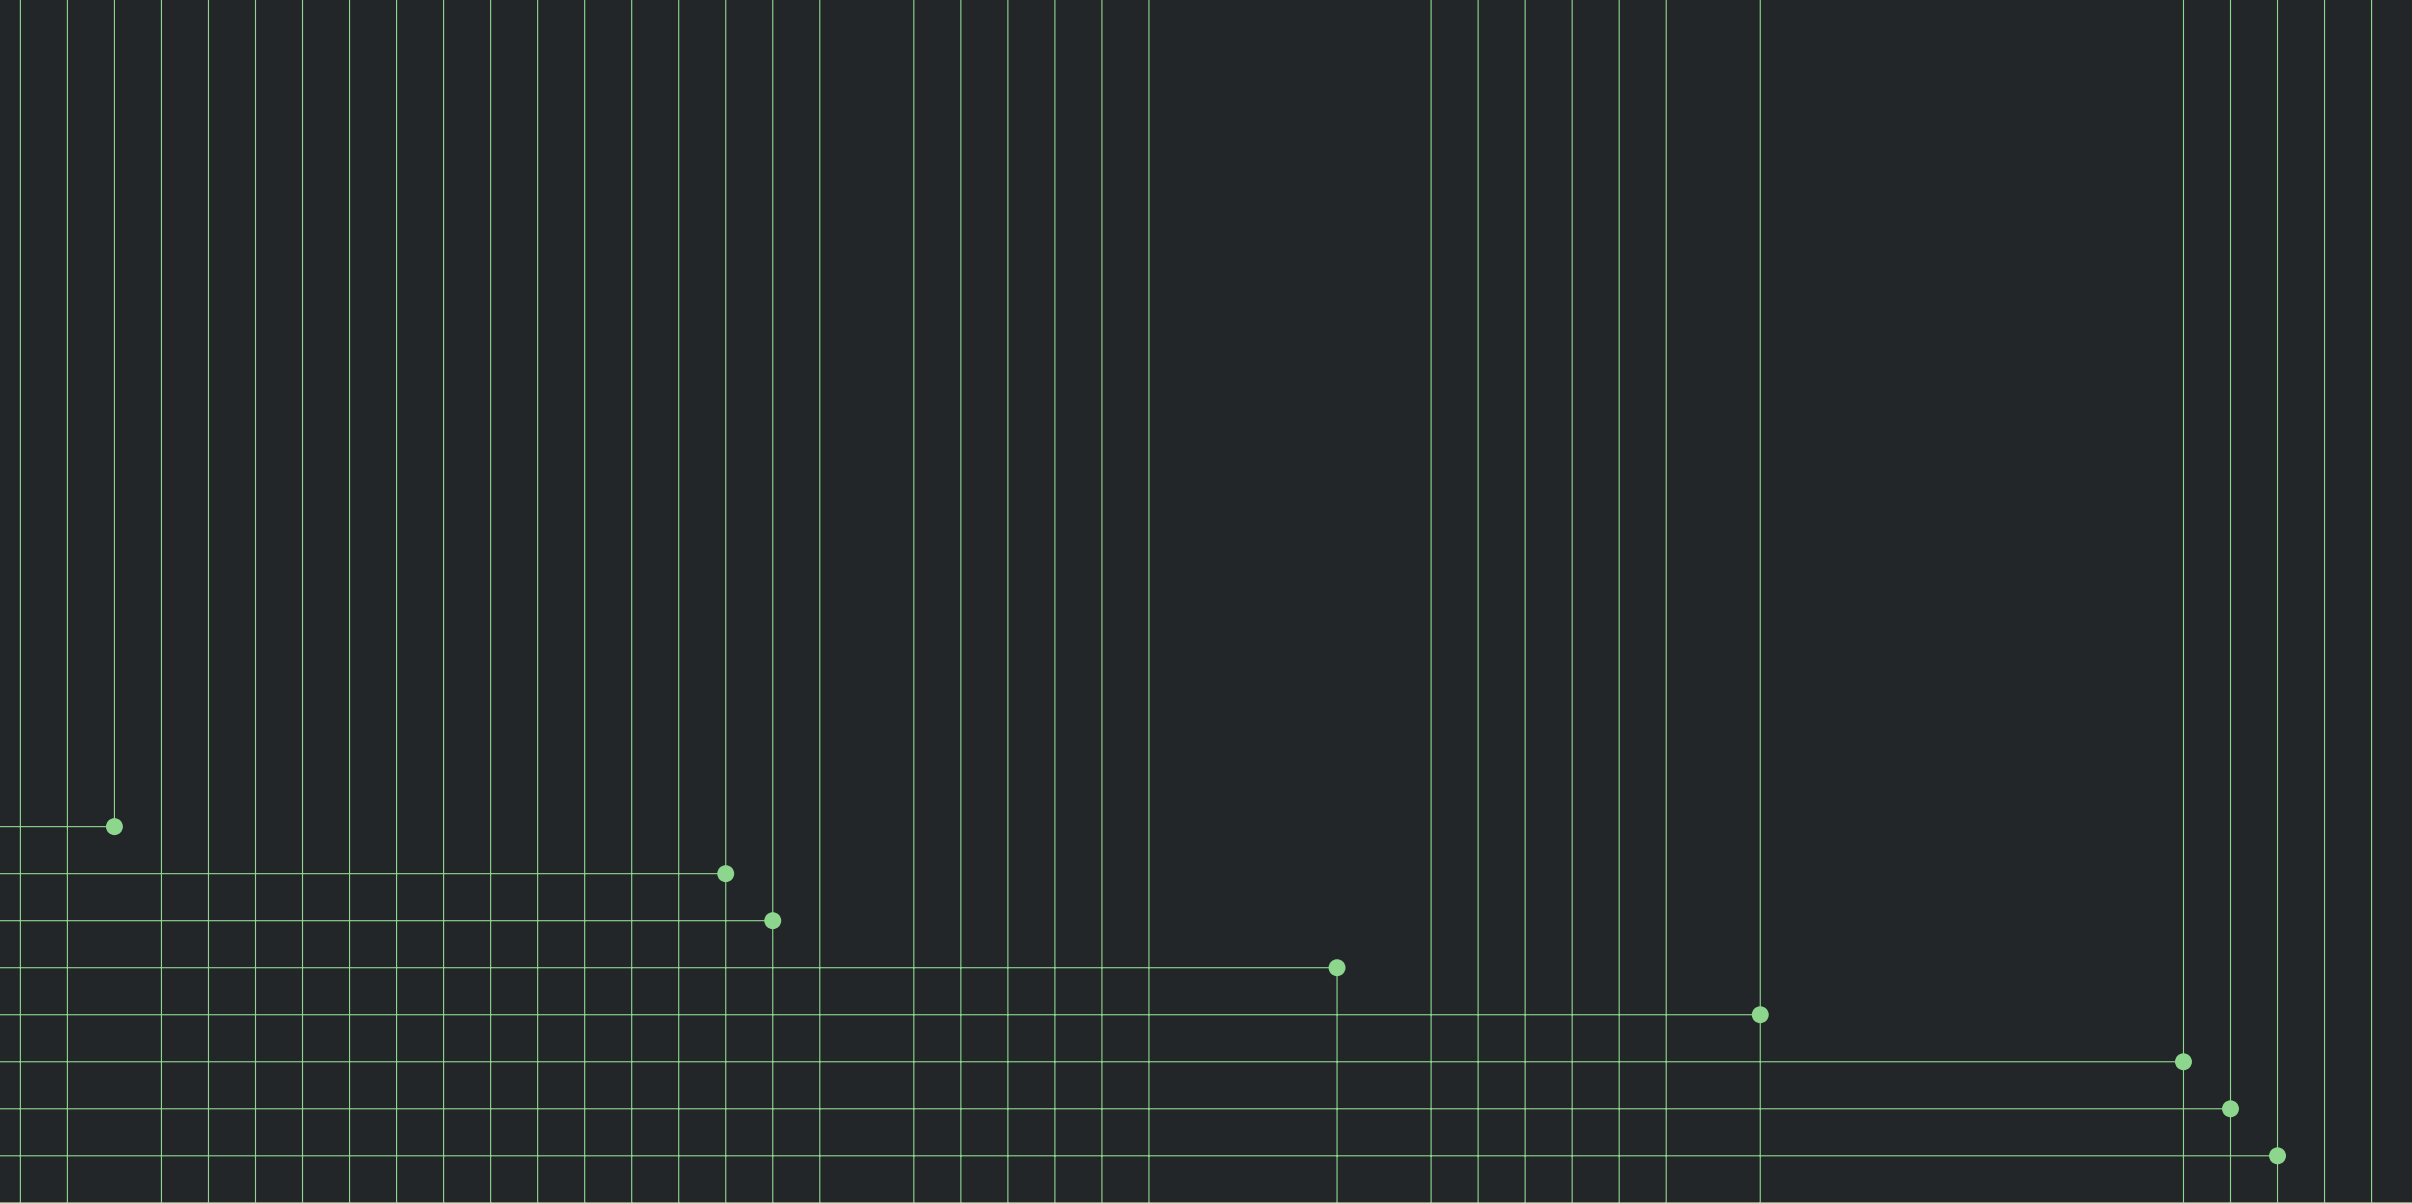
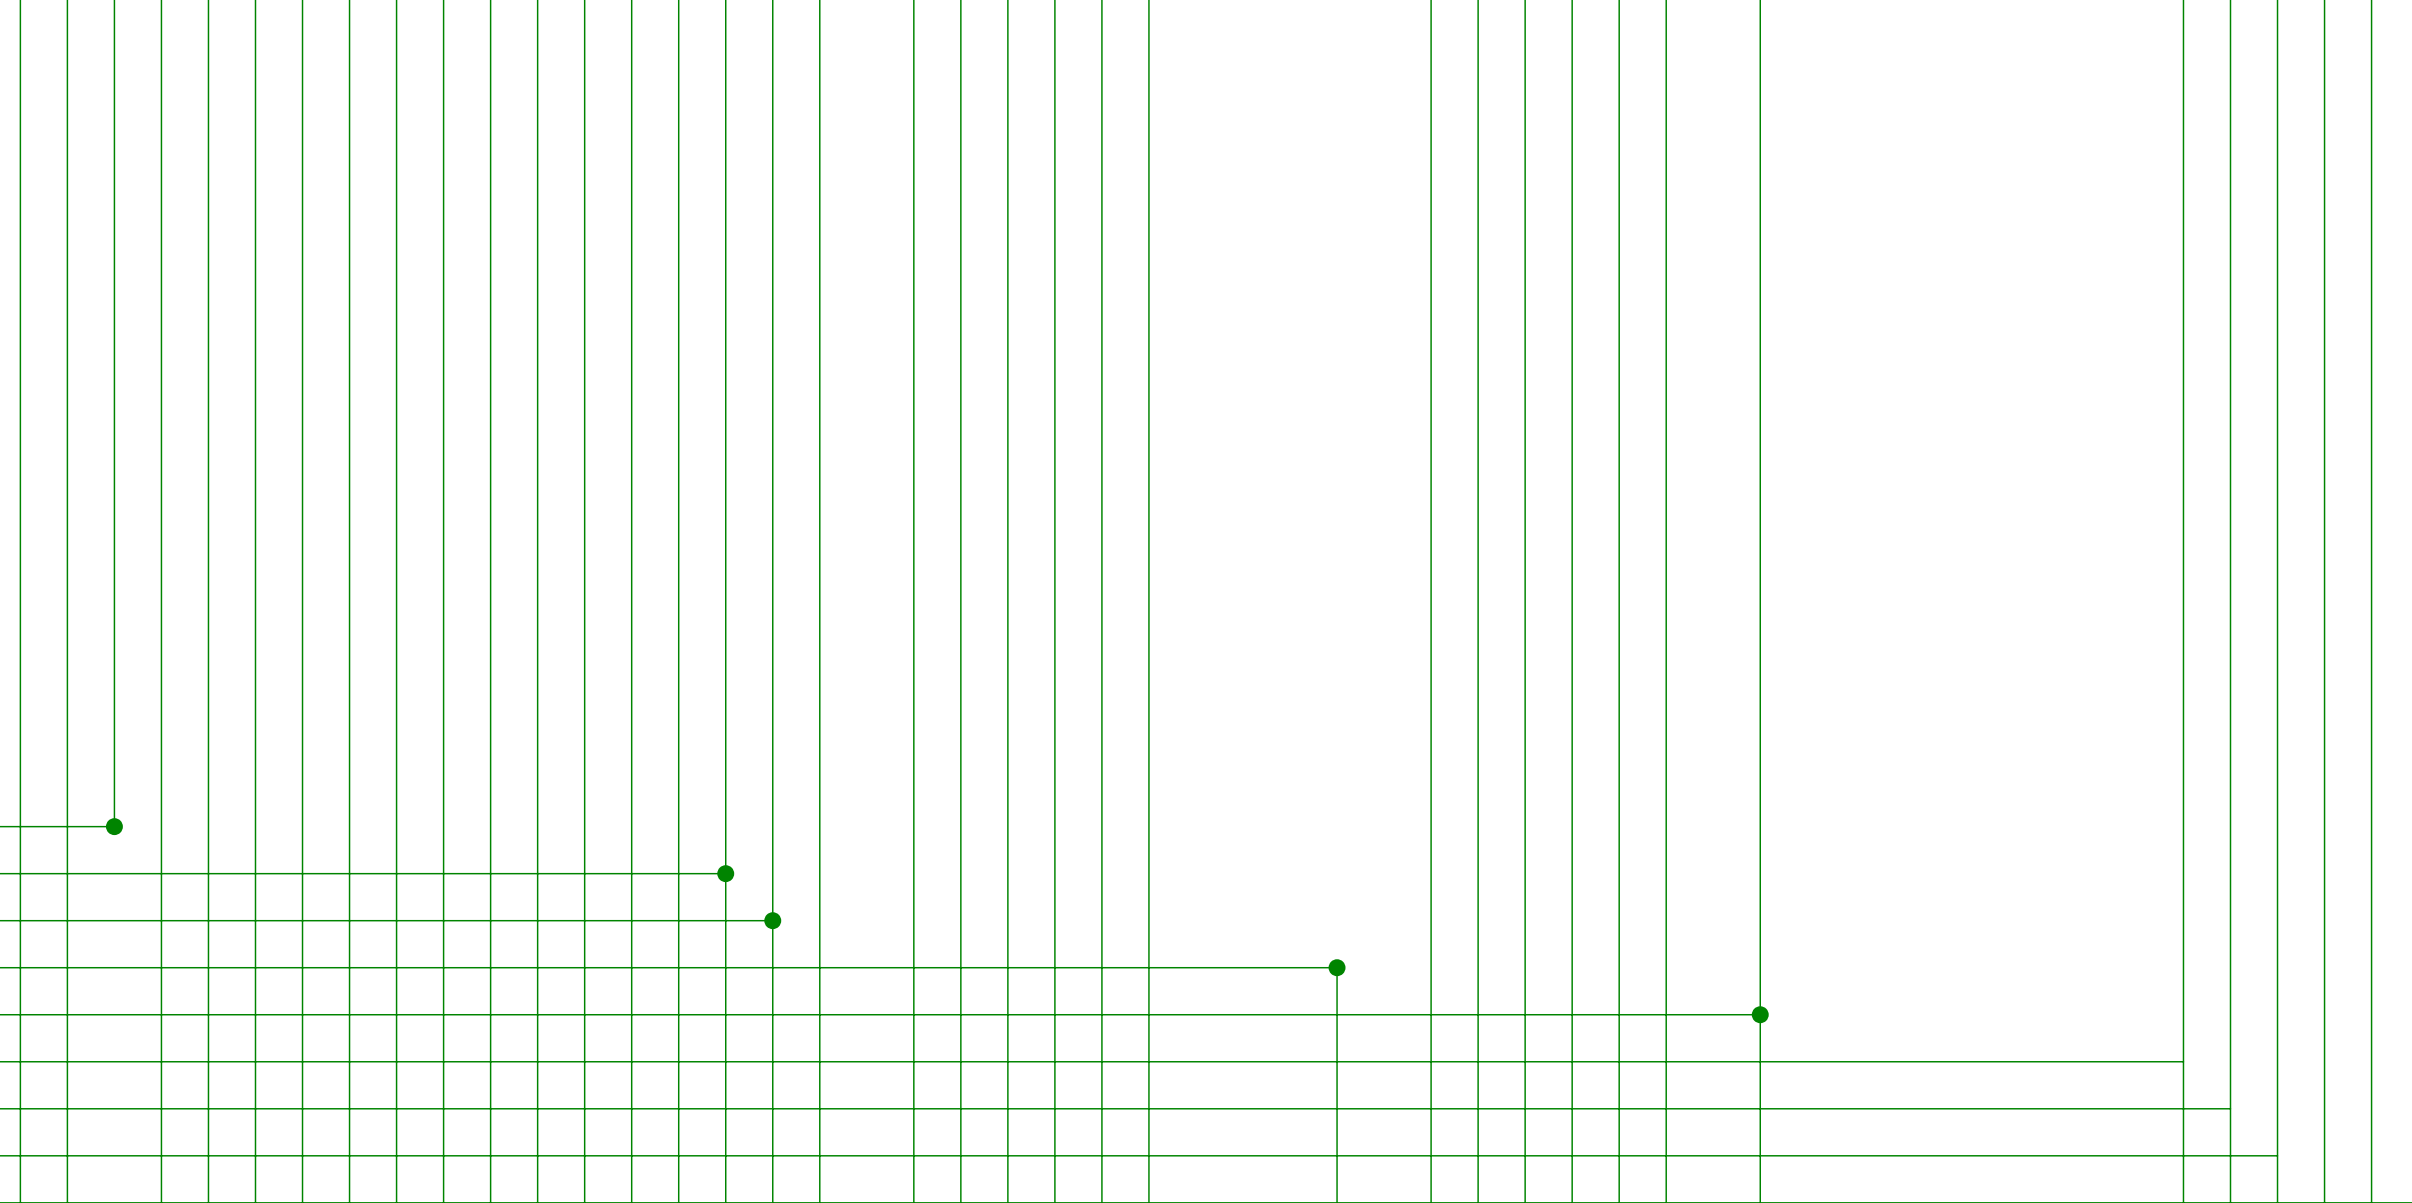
junction: (2183, 1061) -> none
junction: (2230, 1108) -> none
junction: (2277, 1155) -> none

